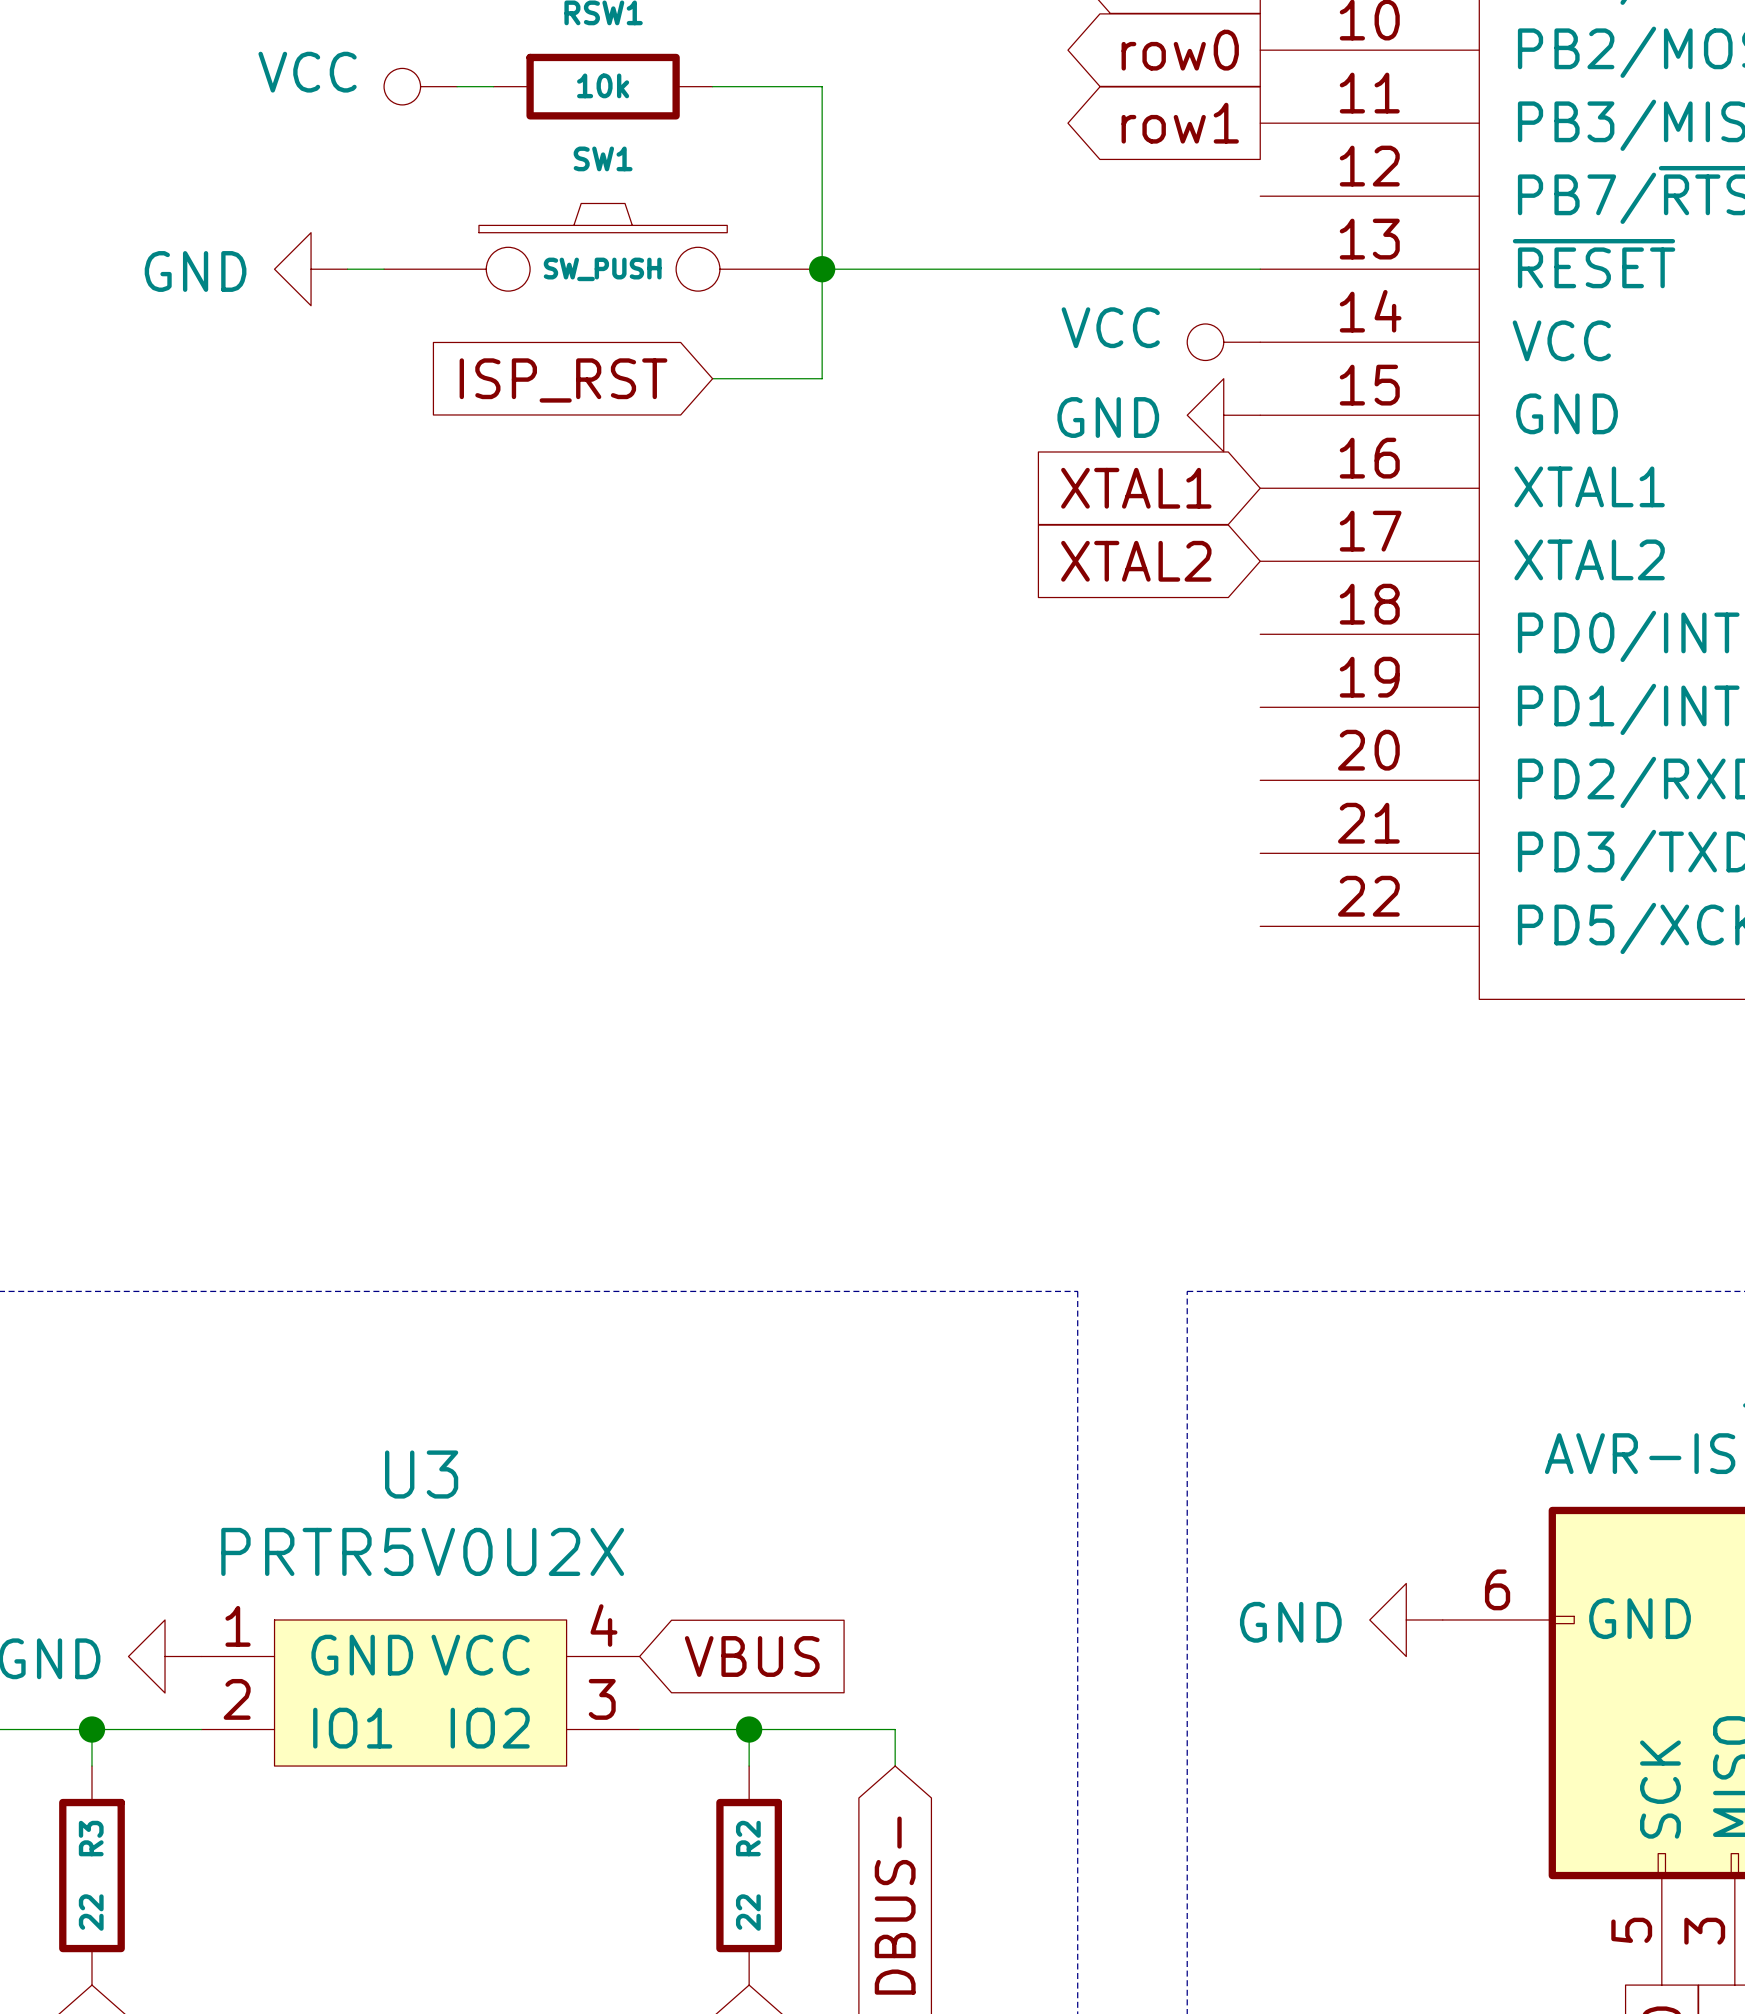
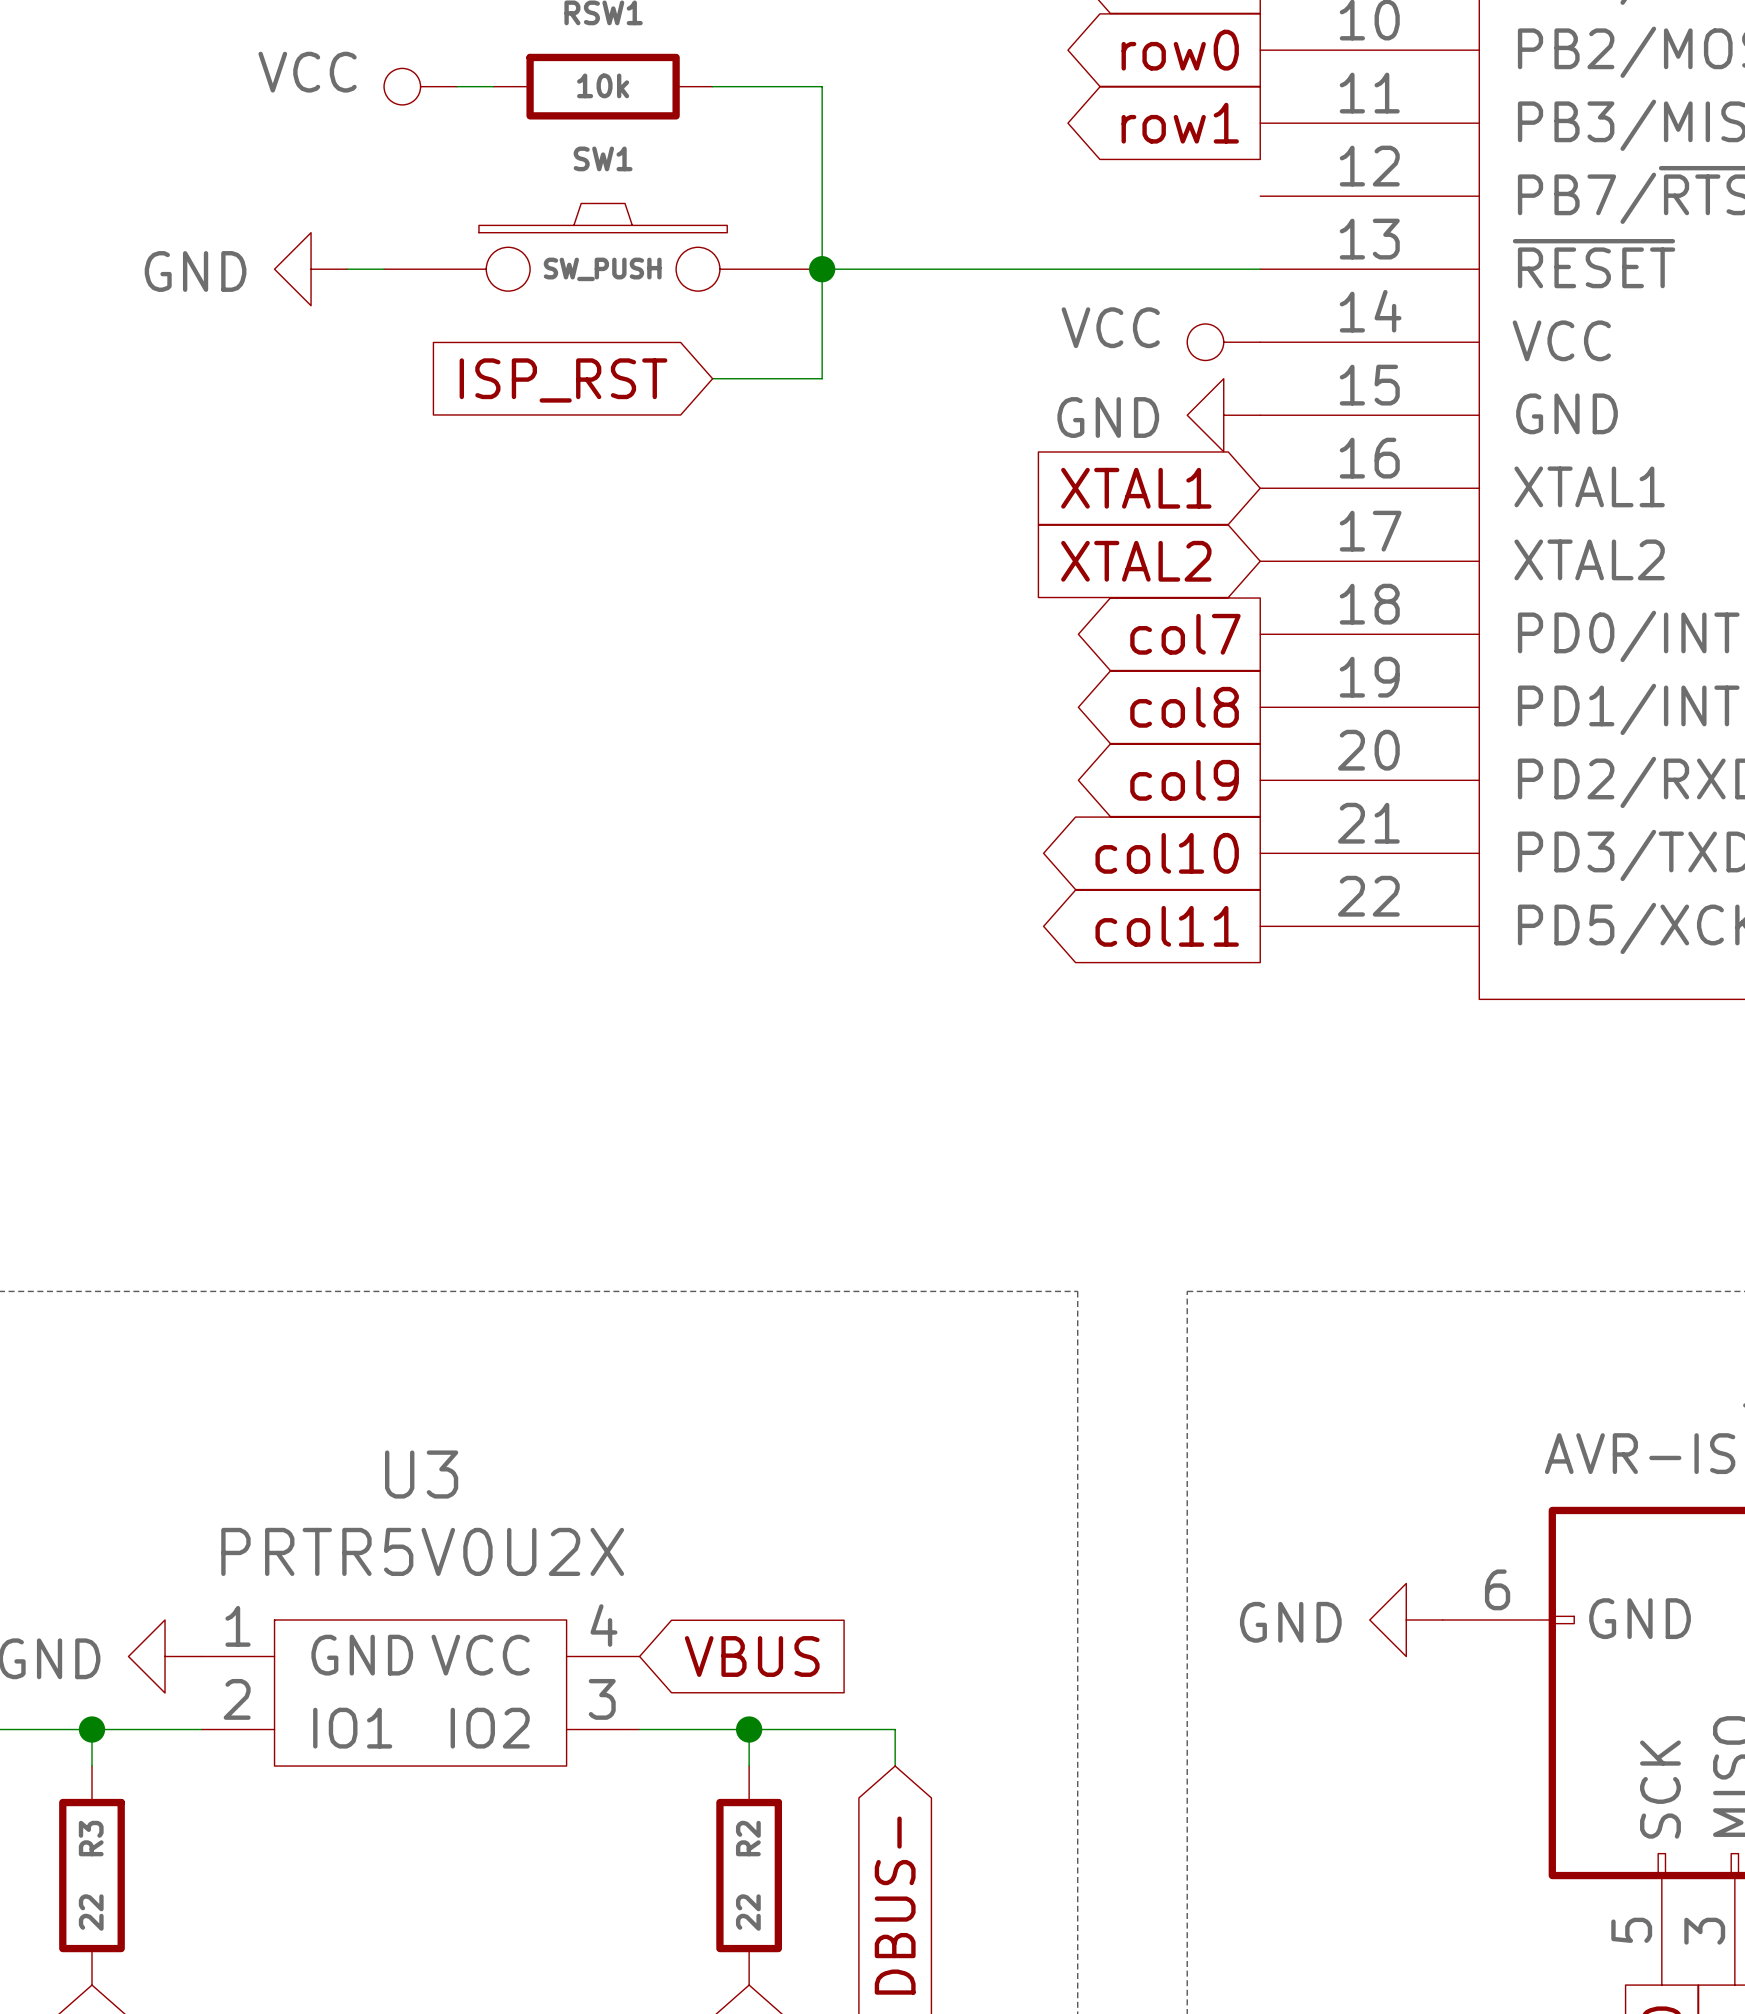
global label: none -> col7 (1185, 634)
global label: none -> col8 (1184, 707)
global label: none -> col9 (1184, 780)
global label: none -> col10 (1167, 853)
global label: none -> col11 (1167, 926)

